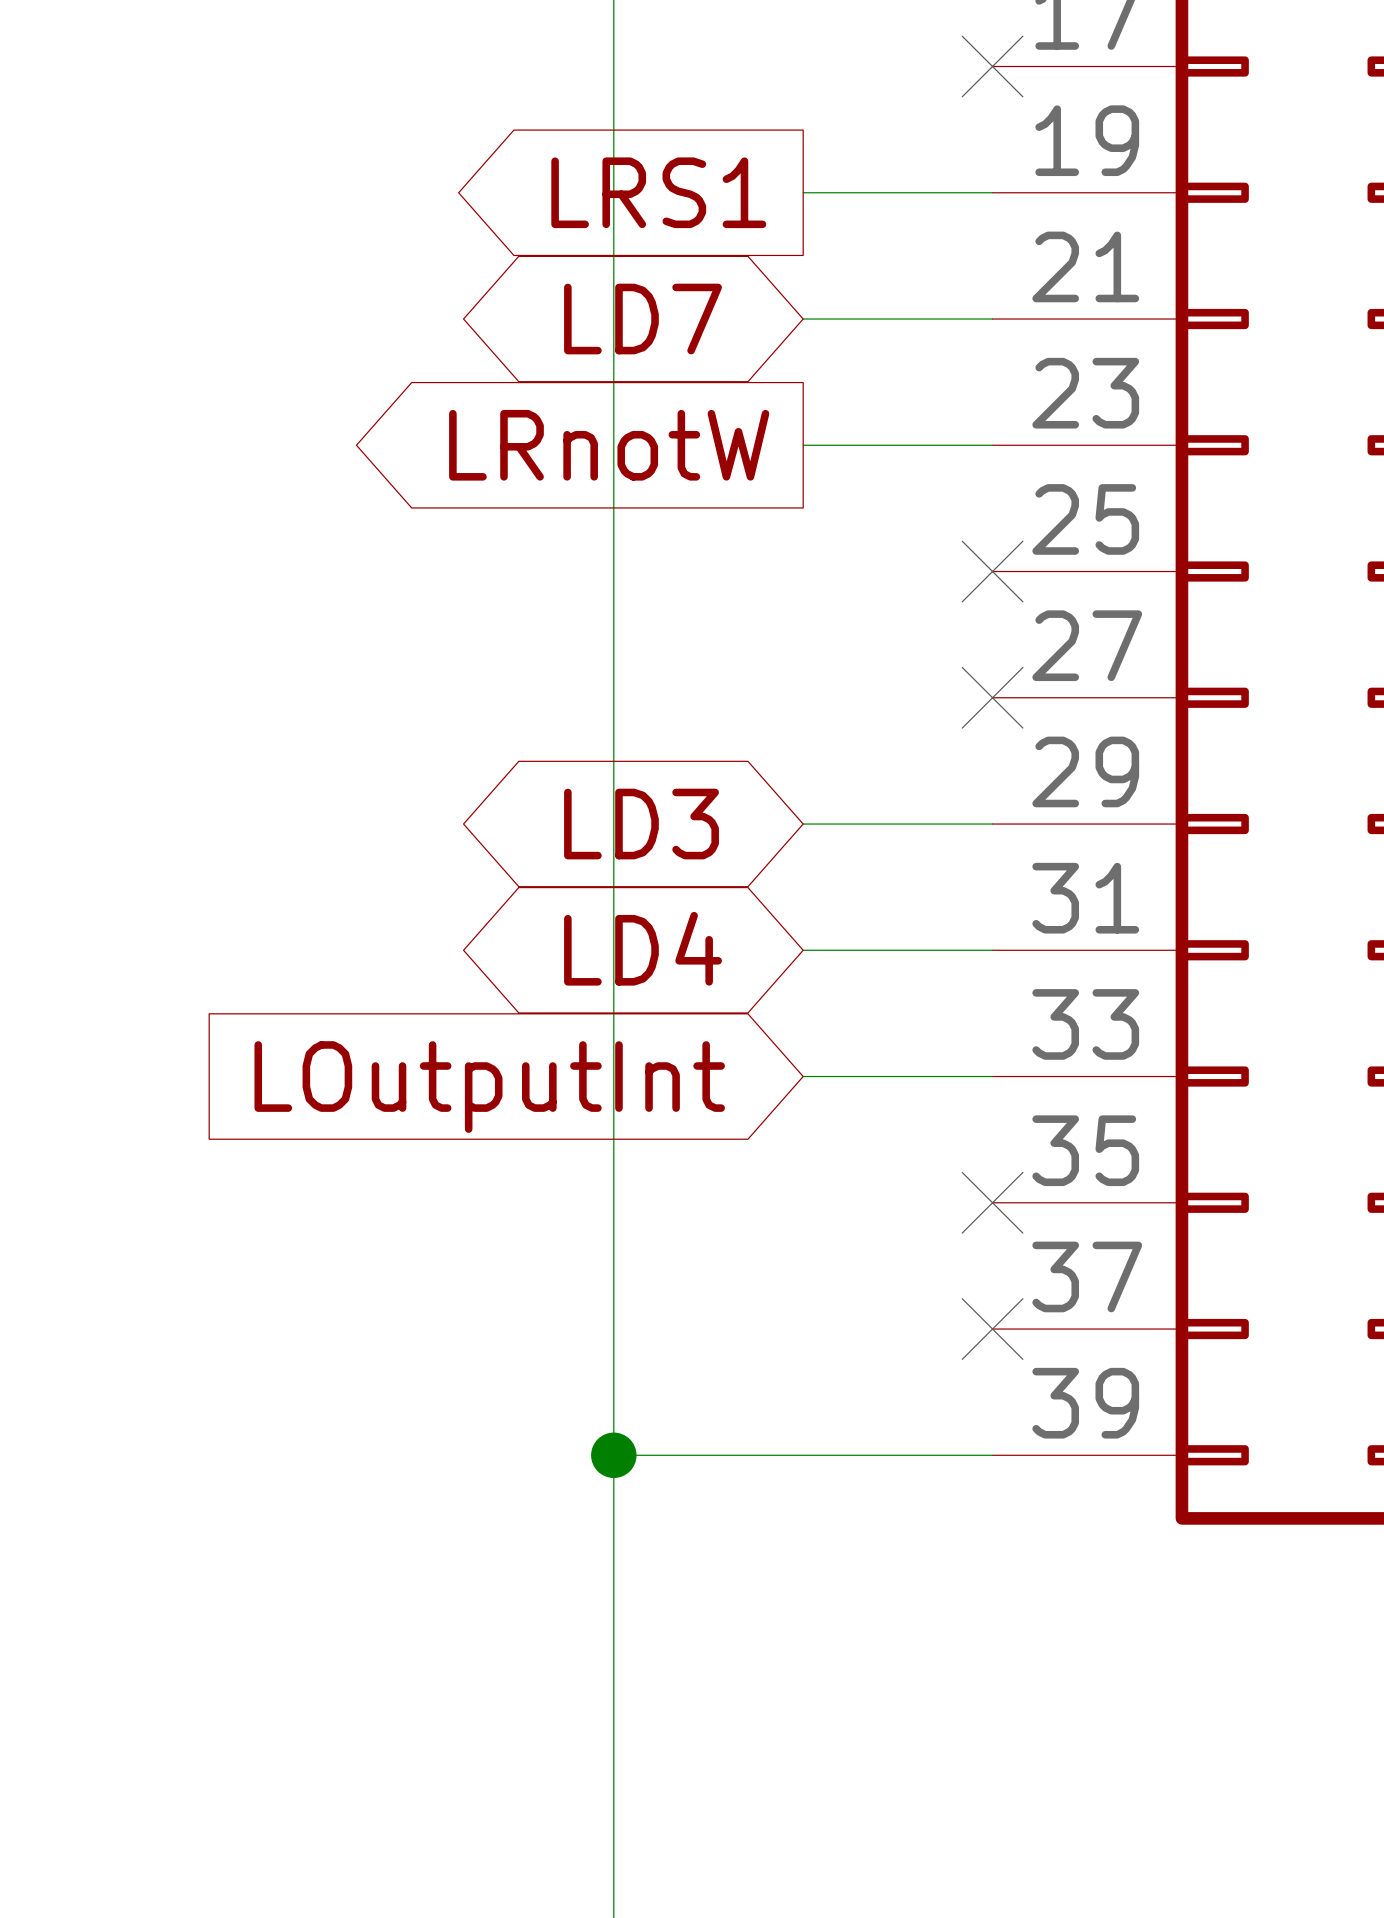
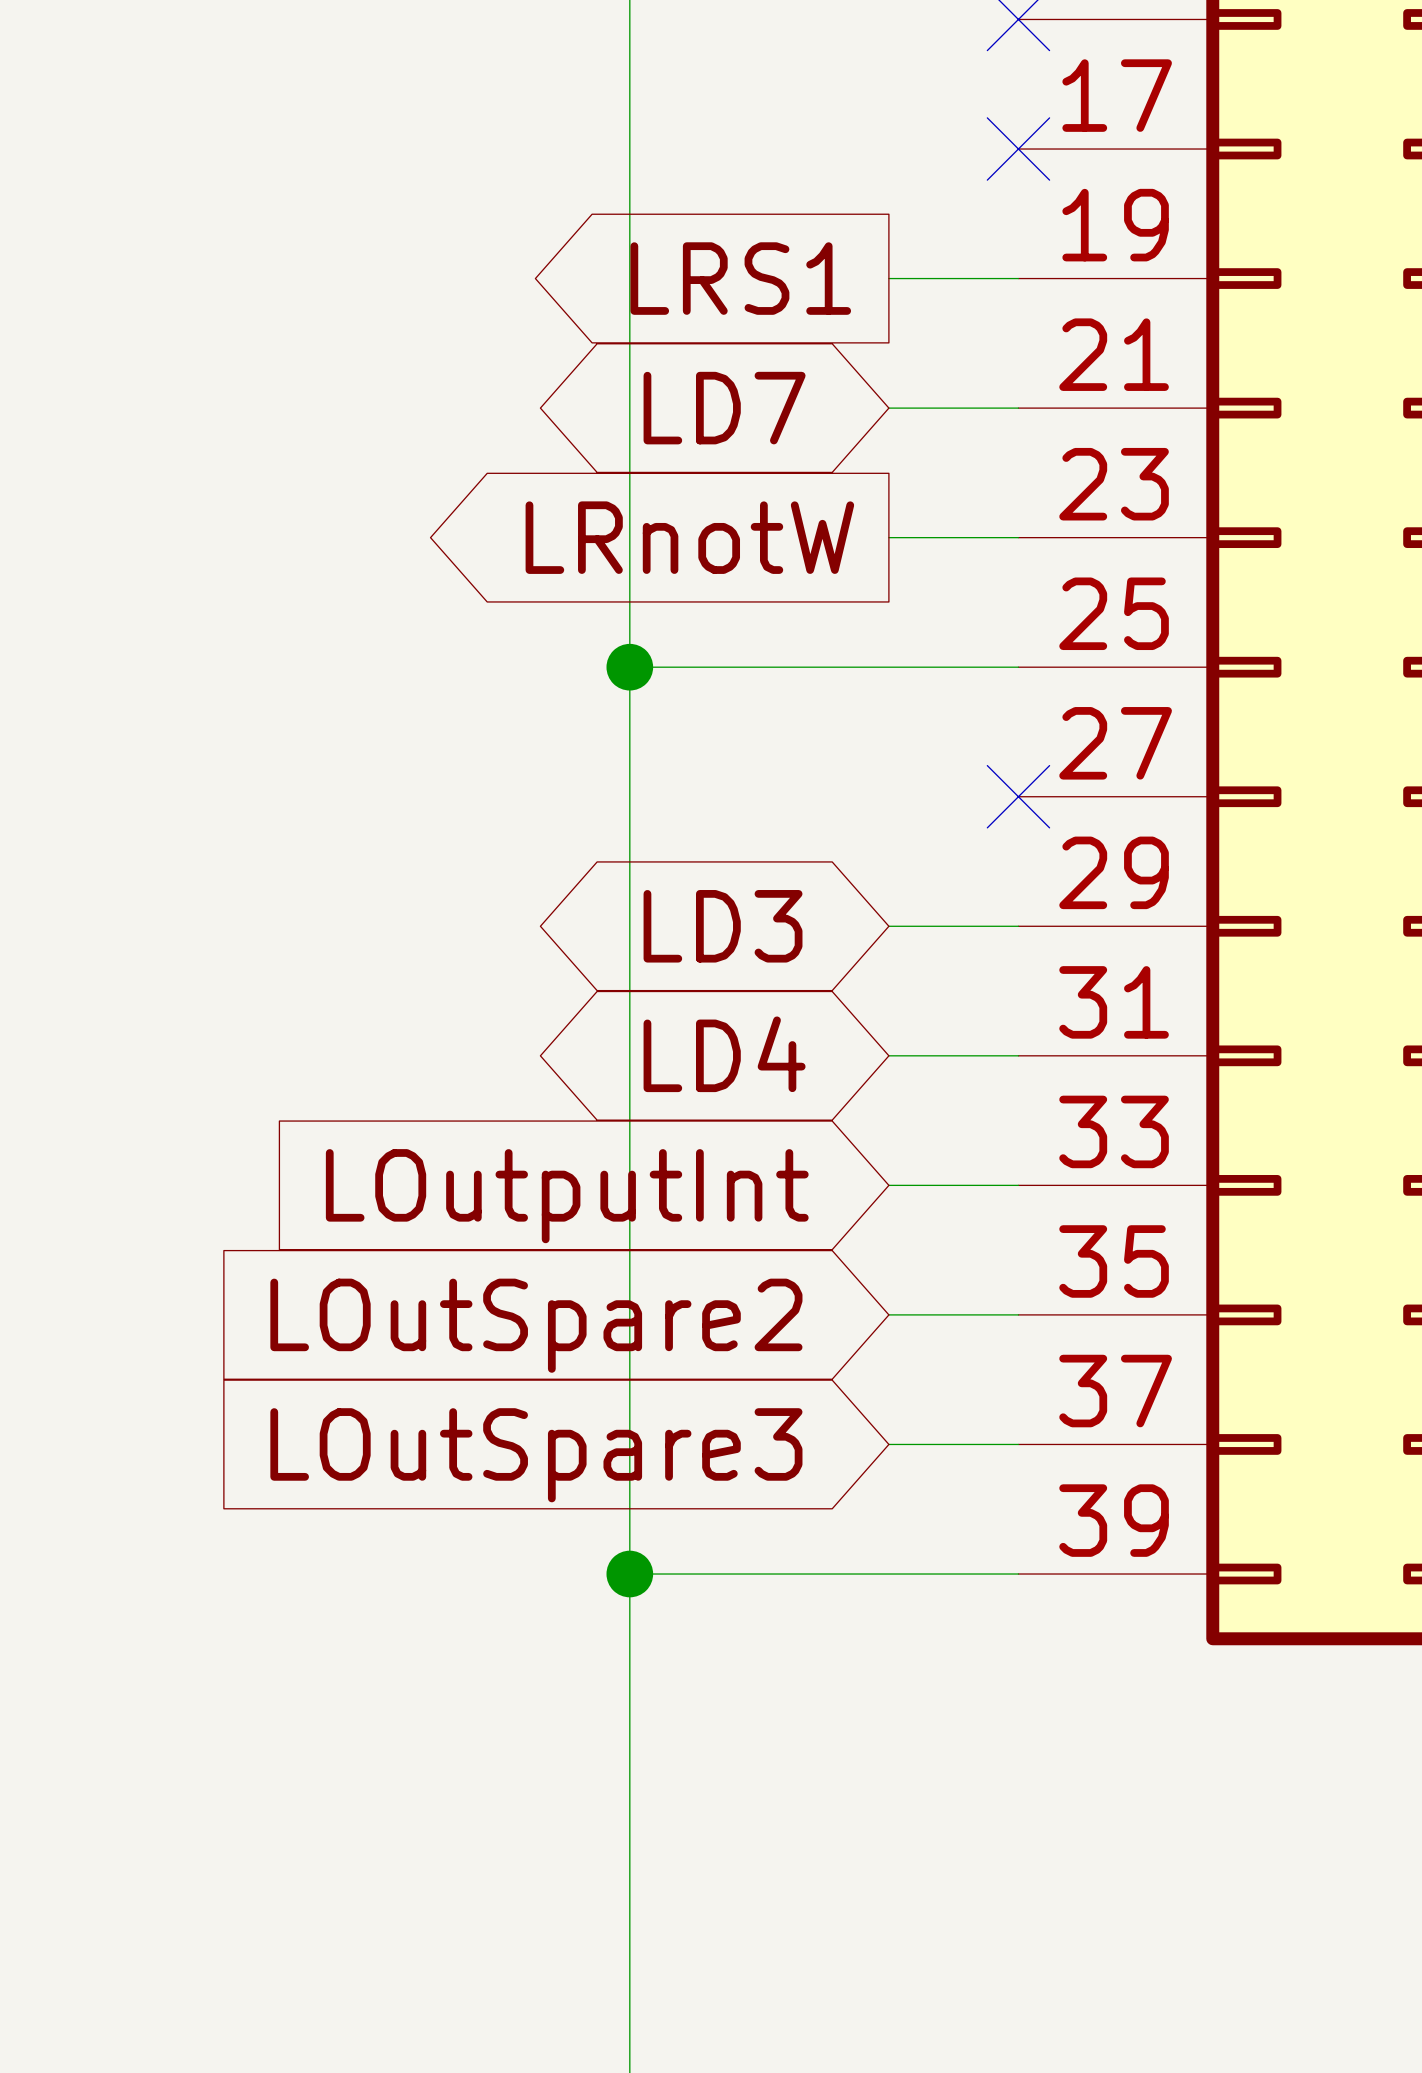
global label position: LRS1 (658, 192) -> LRS1 (740, 278)
wire: (803, 192) (866, 192) -> none
global label position: LD7 (643, 319) -> LD7 (724, 408)
wire: (803, 319) (866, 319) -> none
global label position: LRnotW (609, 445) -> LRnotW (689, 537)
wire: (803, 445) (866, 445) -> none
wire: none -> (629, 667) (1018, 667)
junction: none -> (629, 667)
no-connect mark: (992, 571) -> none
global label position: LD3 (641, 824) -> LD3 (723, 926)
wire: (803, 824) (866, 824) -> none
global label position: LD4 (643, 948) -> LD4 (724, 1054)
wire: (803, 950) (866, 950) -> none
wire: (803, 1076) (866, 1076) -> none
global label position: LOutputInt (489, 1087) -> LOutputInt (567, 1196)
wire: none -> (888, 1314) (1018, 1314)
no-connect mark: (992, 1202) -> none
global label: none -> LOutSpare2 (536, 1325)
wire: none -> (888, 1444) (1018, 1444)
no-connect mark: (992, 1329) -> none
global label: none -> LOutSpare3 (536, 1455)

